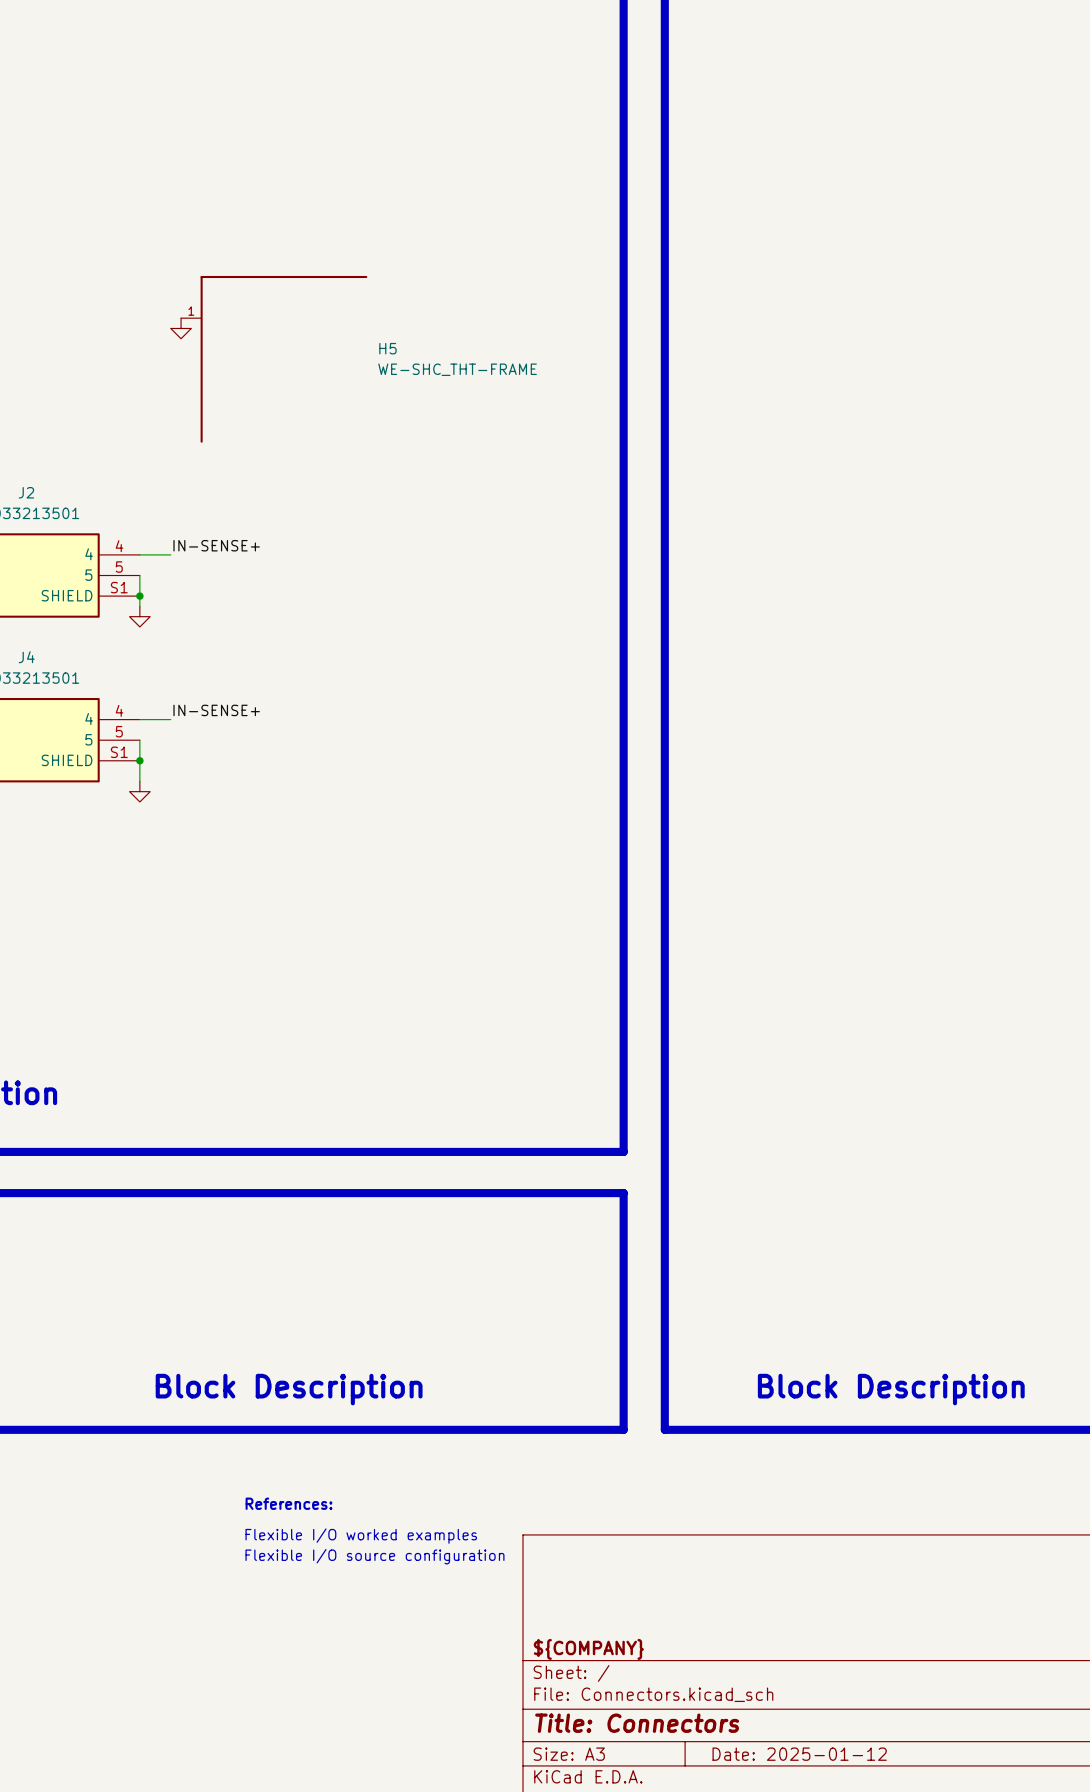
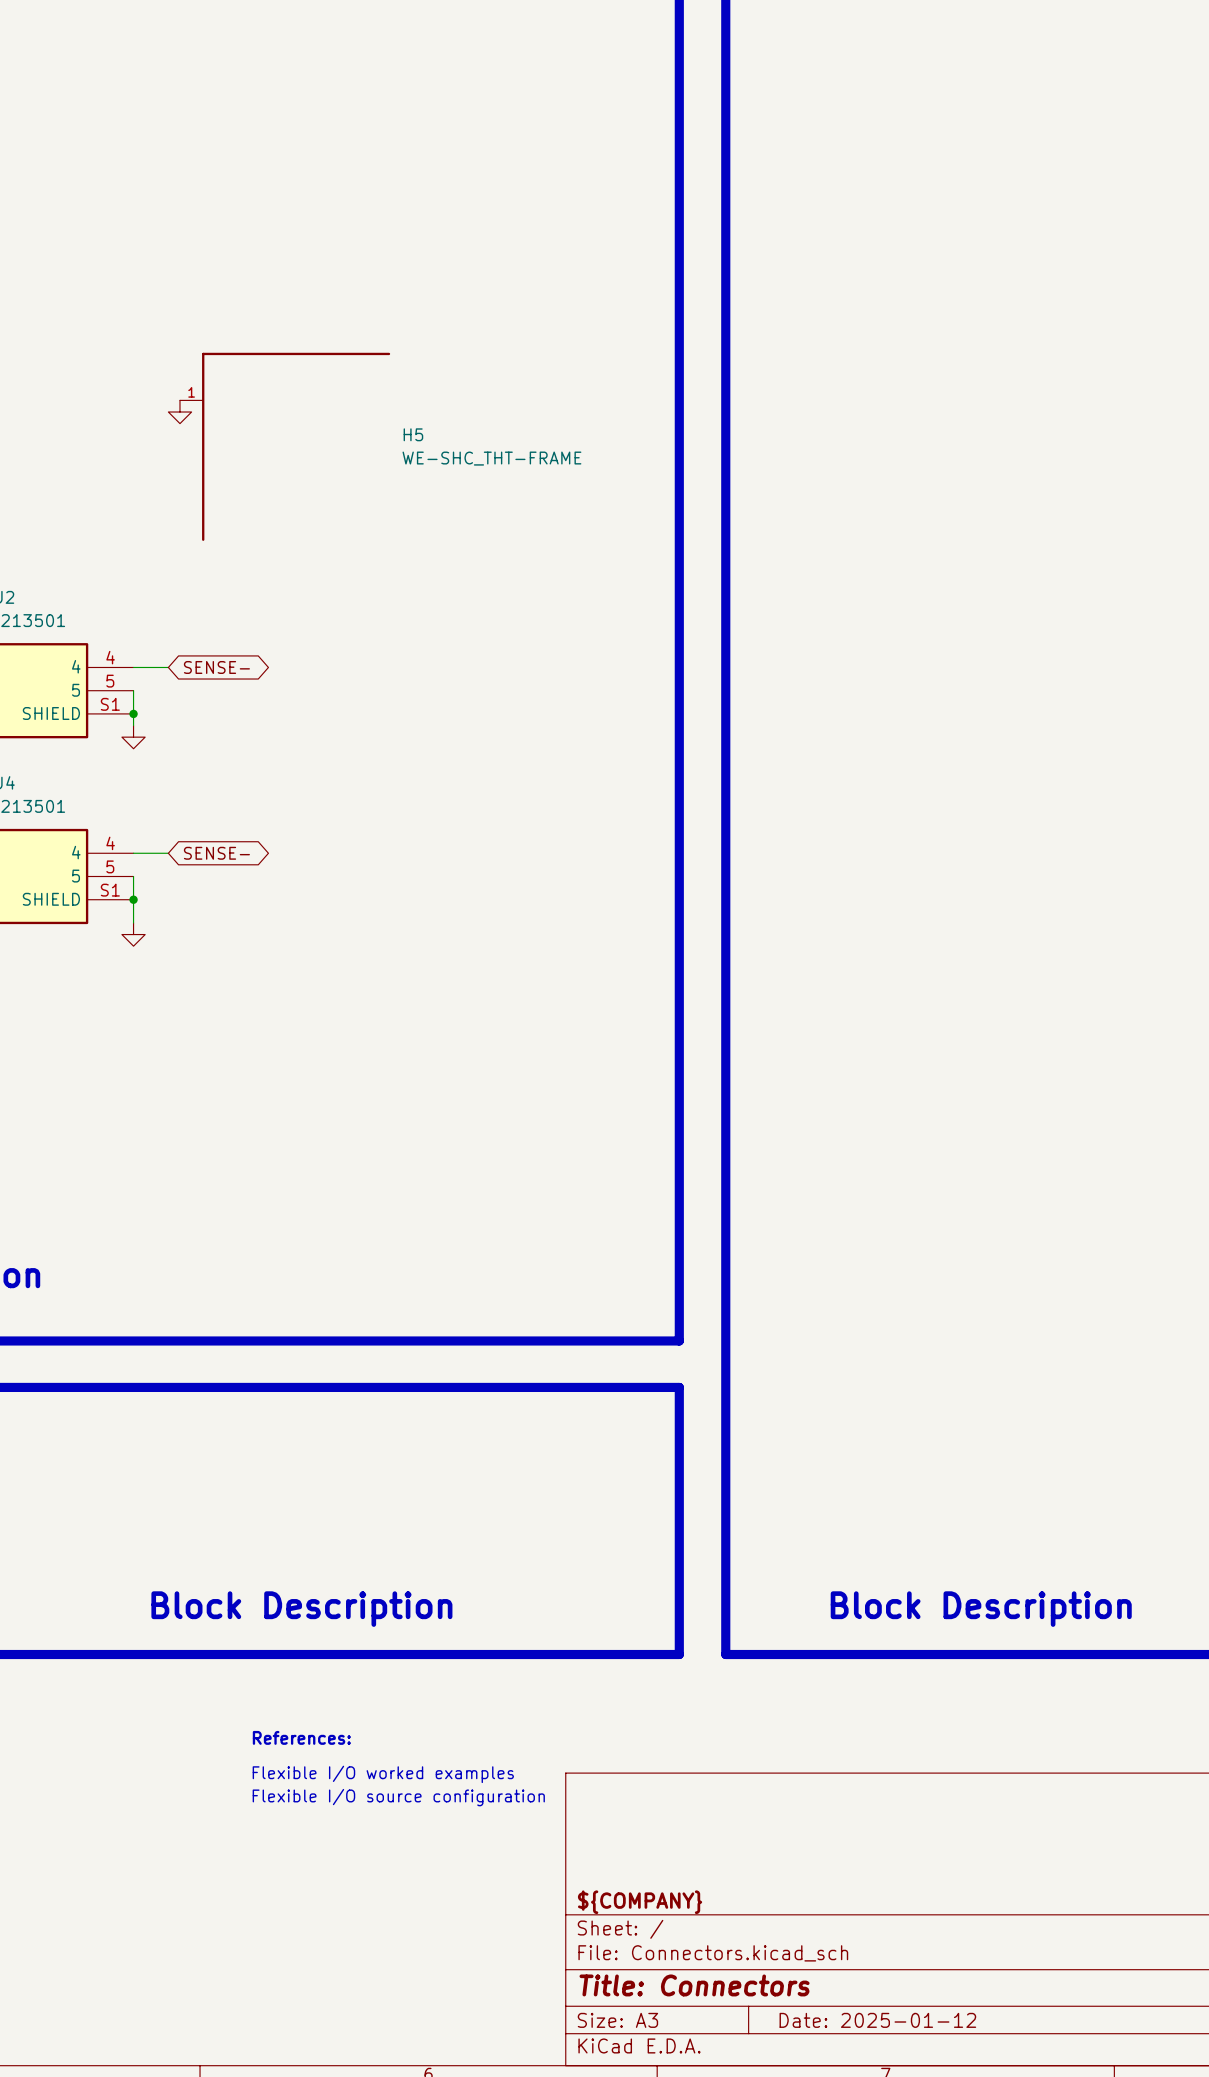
label: IN-SENSE+ (216, 545) -> none
global label: none -> SENSE- (216, 667)
label: IN-SENSE+ (216, 710) -> none
global label: none -> SENSE- (216, 853)

